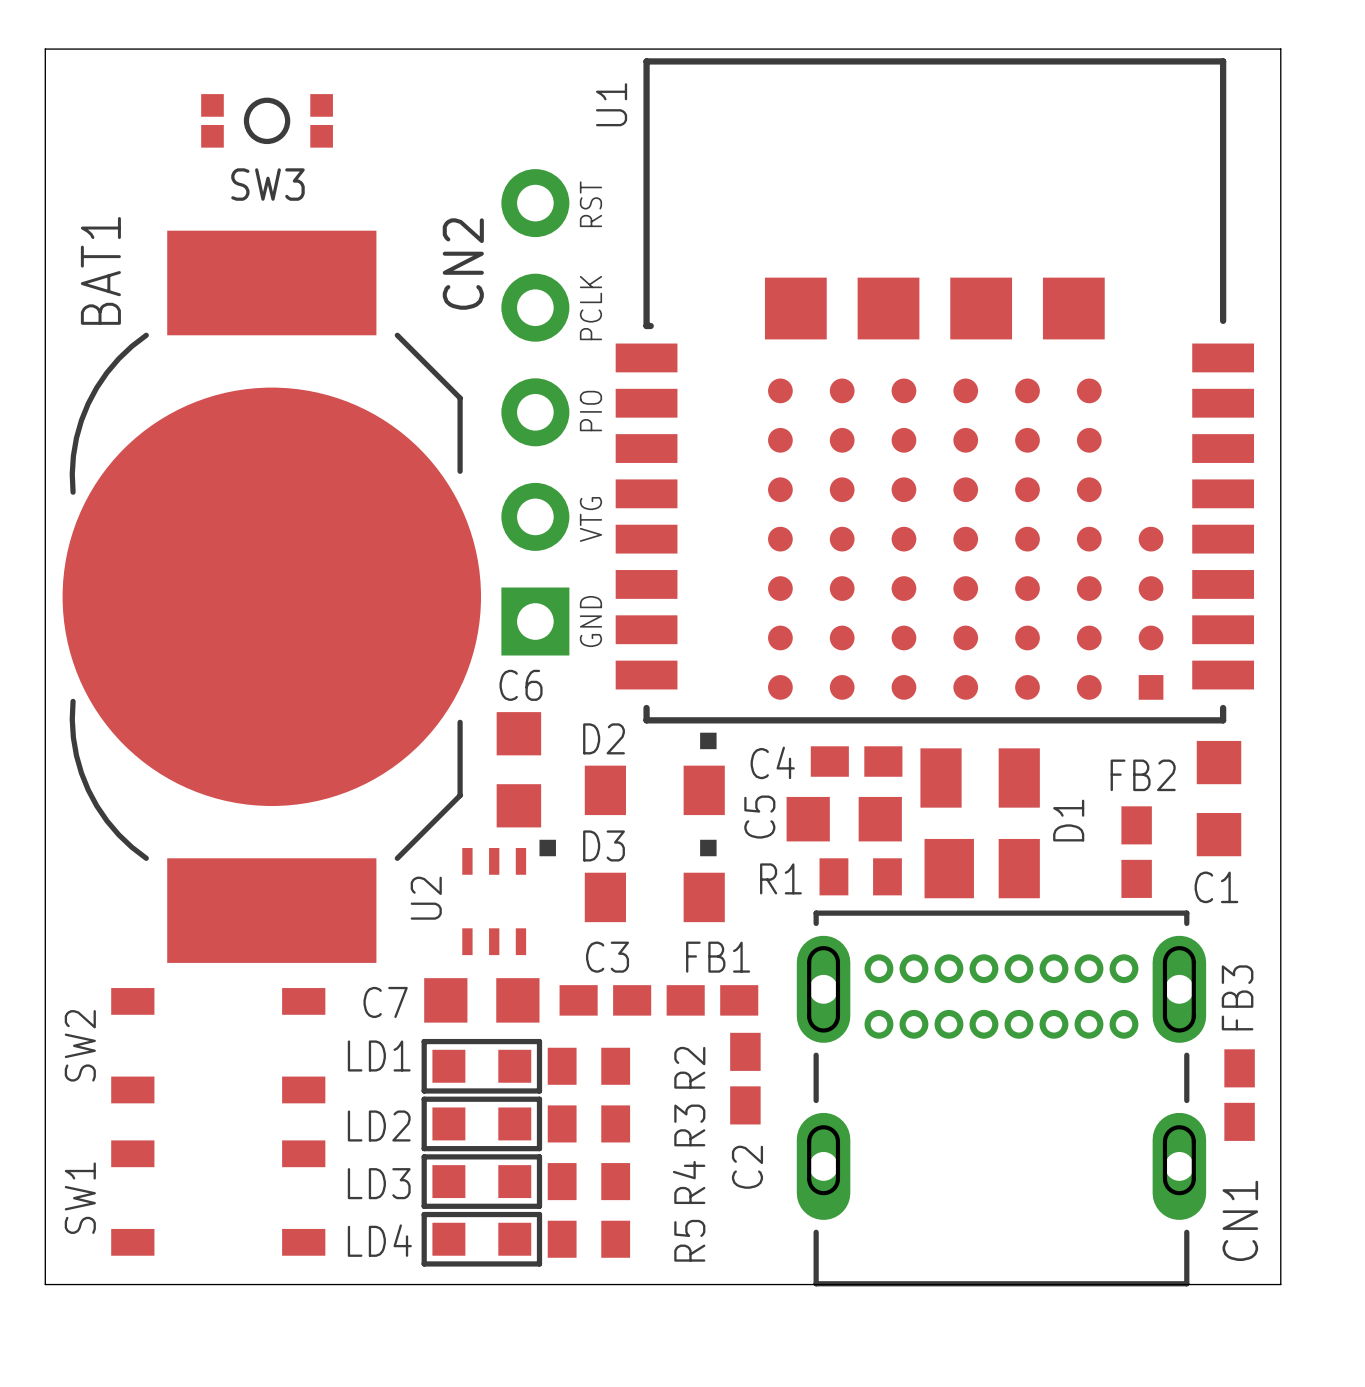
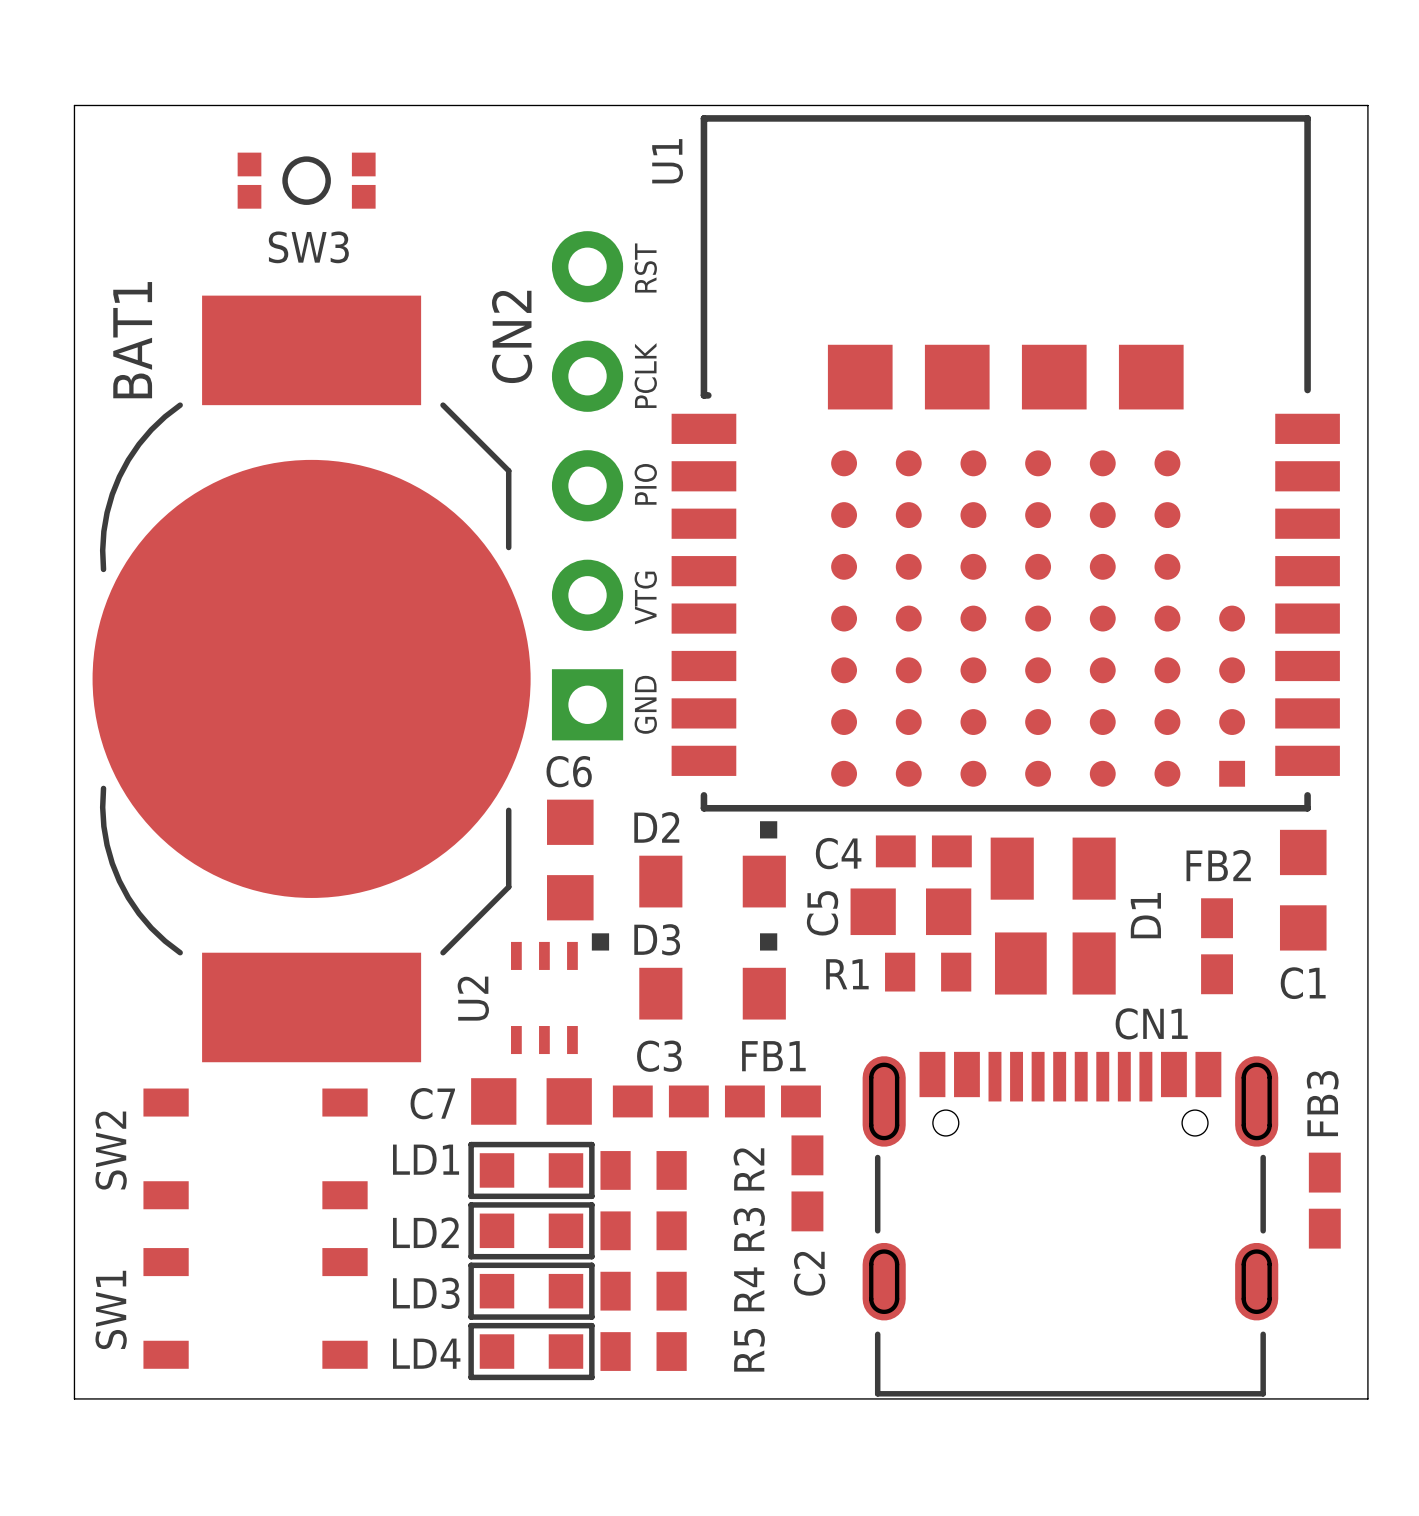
CN1 footprint: [796, 910, 1207, 1287] -> [862, 1051, 1279, 1397]
CN1 name position: CN1 (1240, 1220) -> CN1 (1151, 1023)

